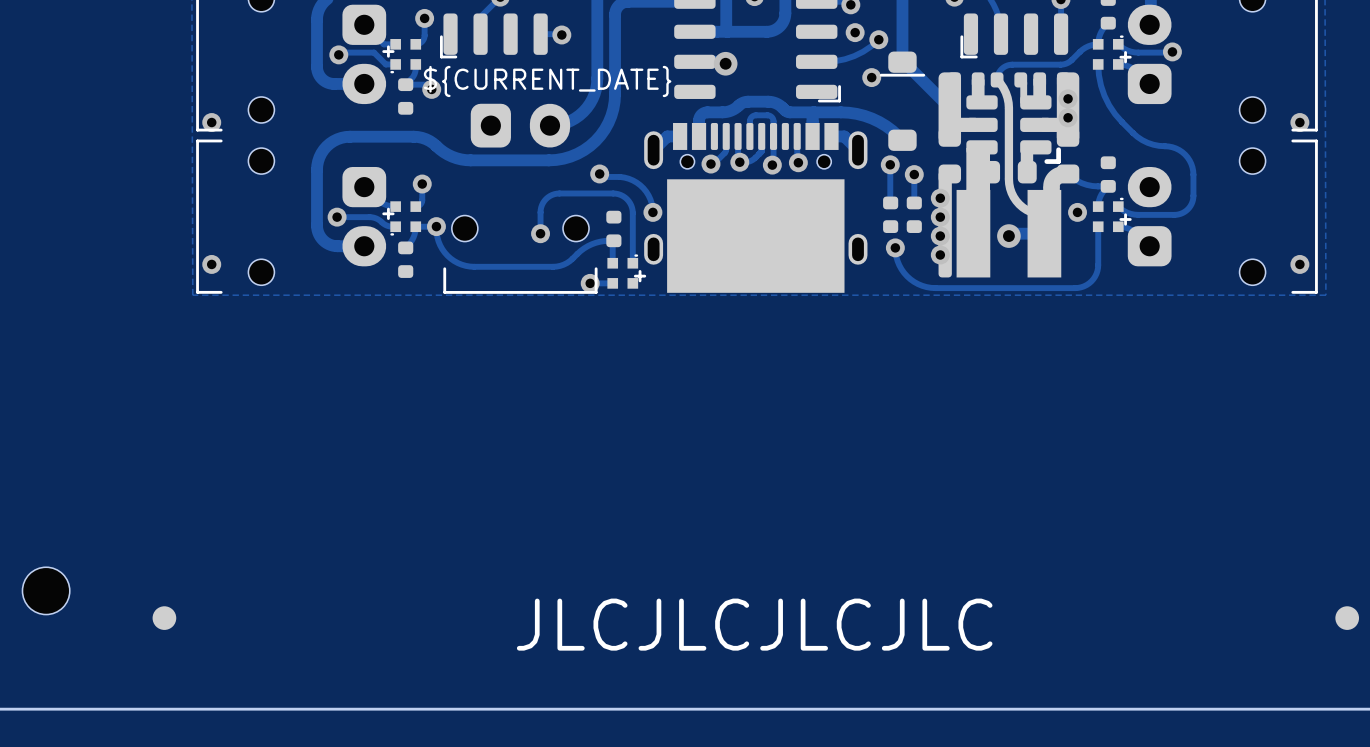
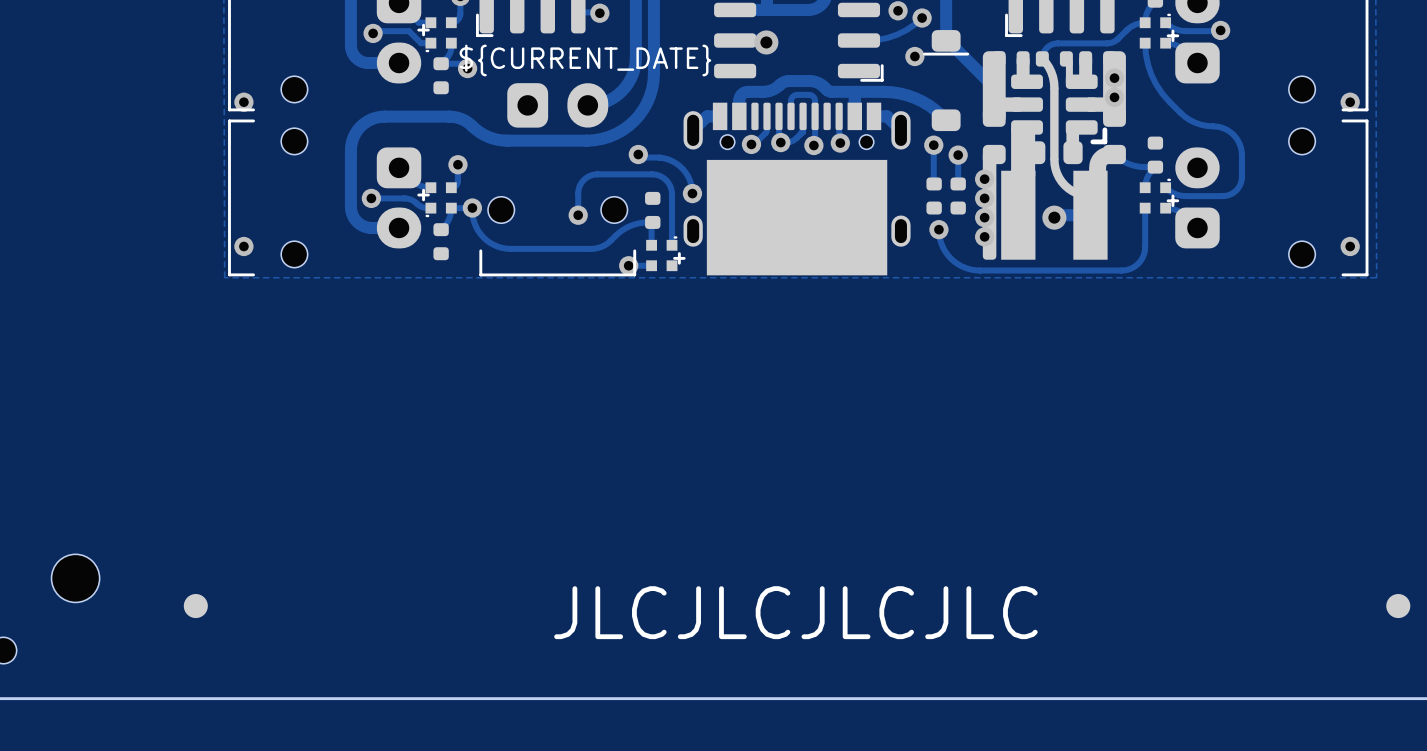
via: (1077, 212) -> none

